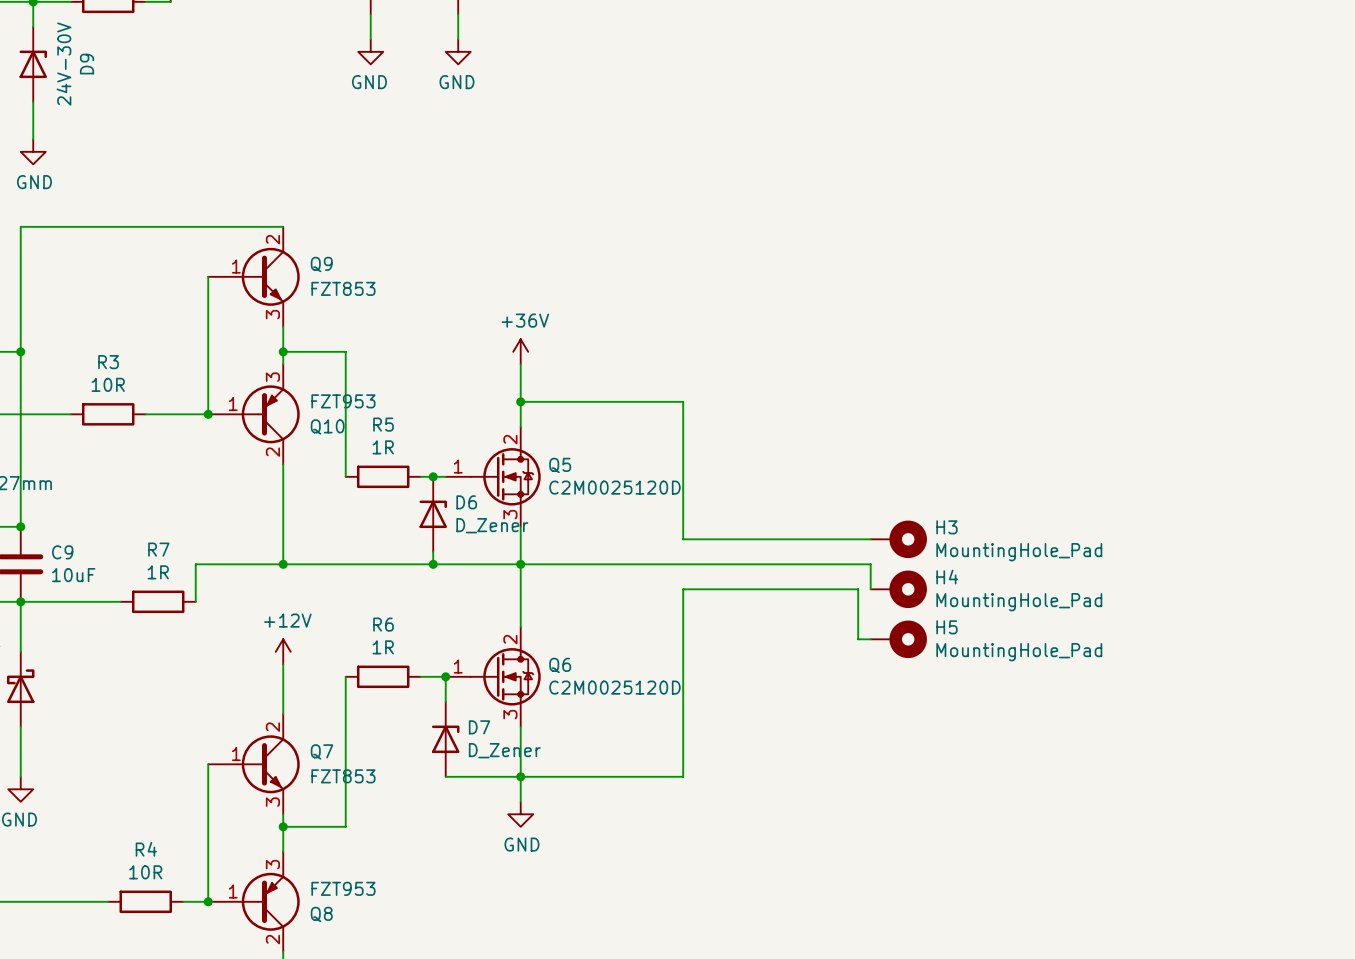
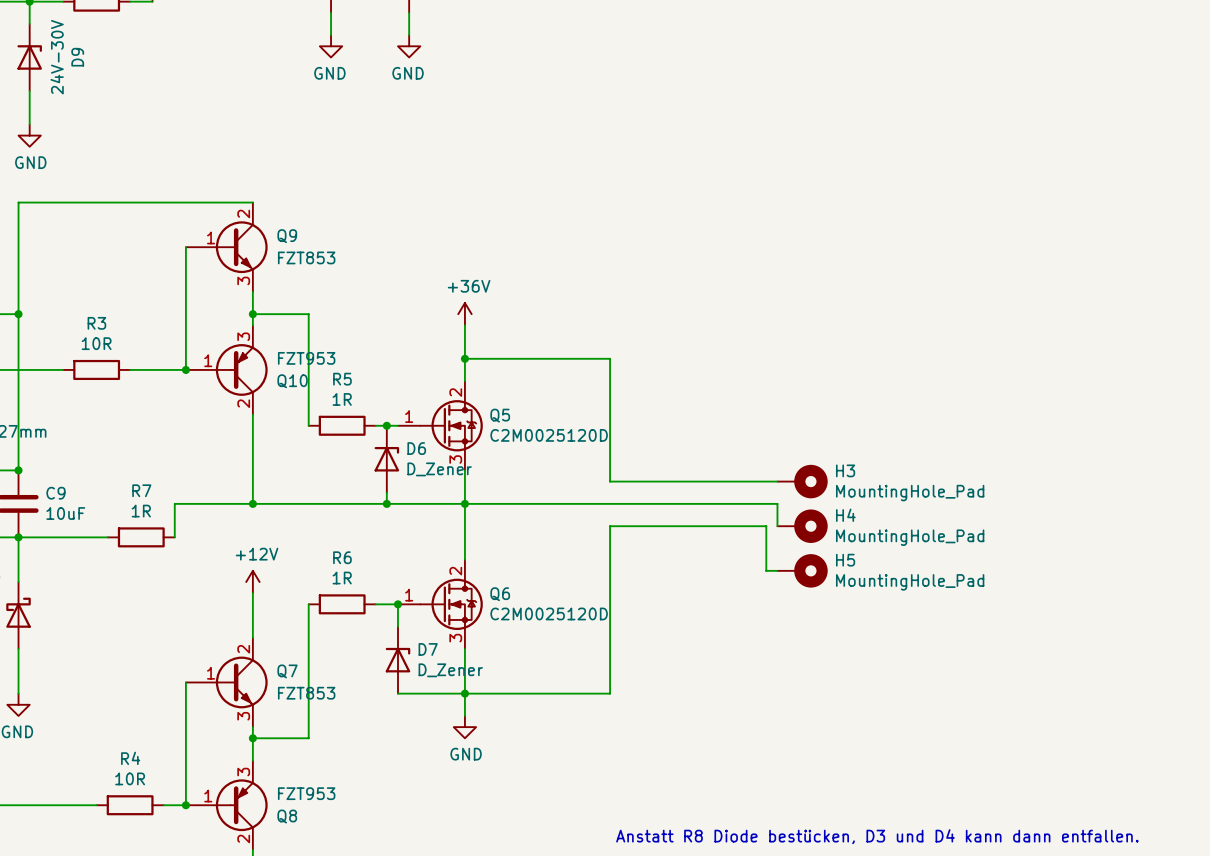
text: none -> Anstatt R8 Diode bestücken, D3 und D4 kann dann entfallen. (877, 836)

